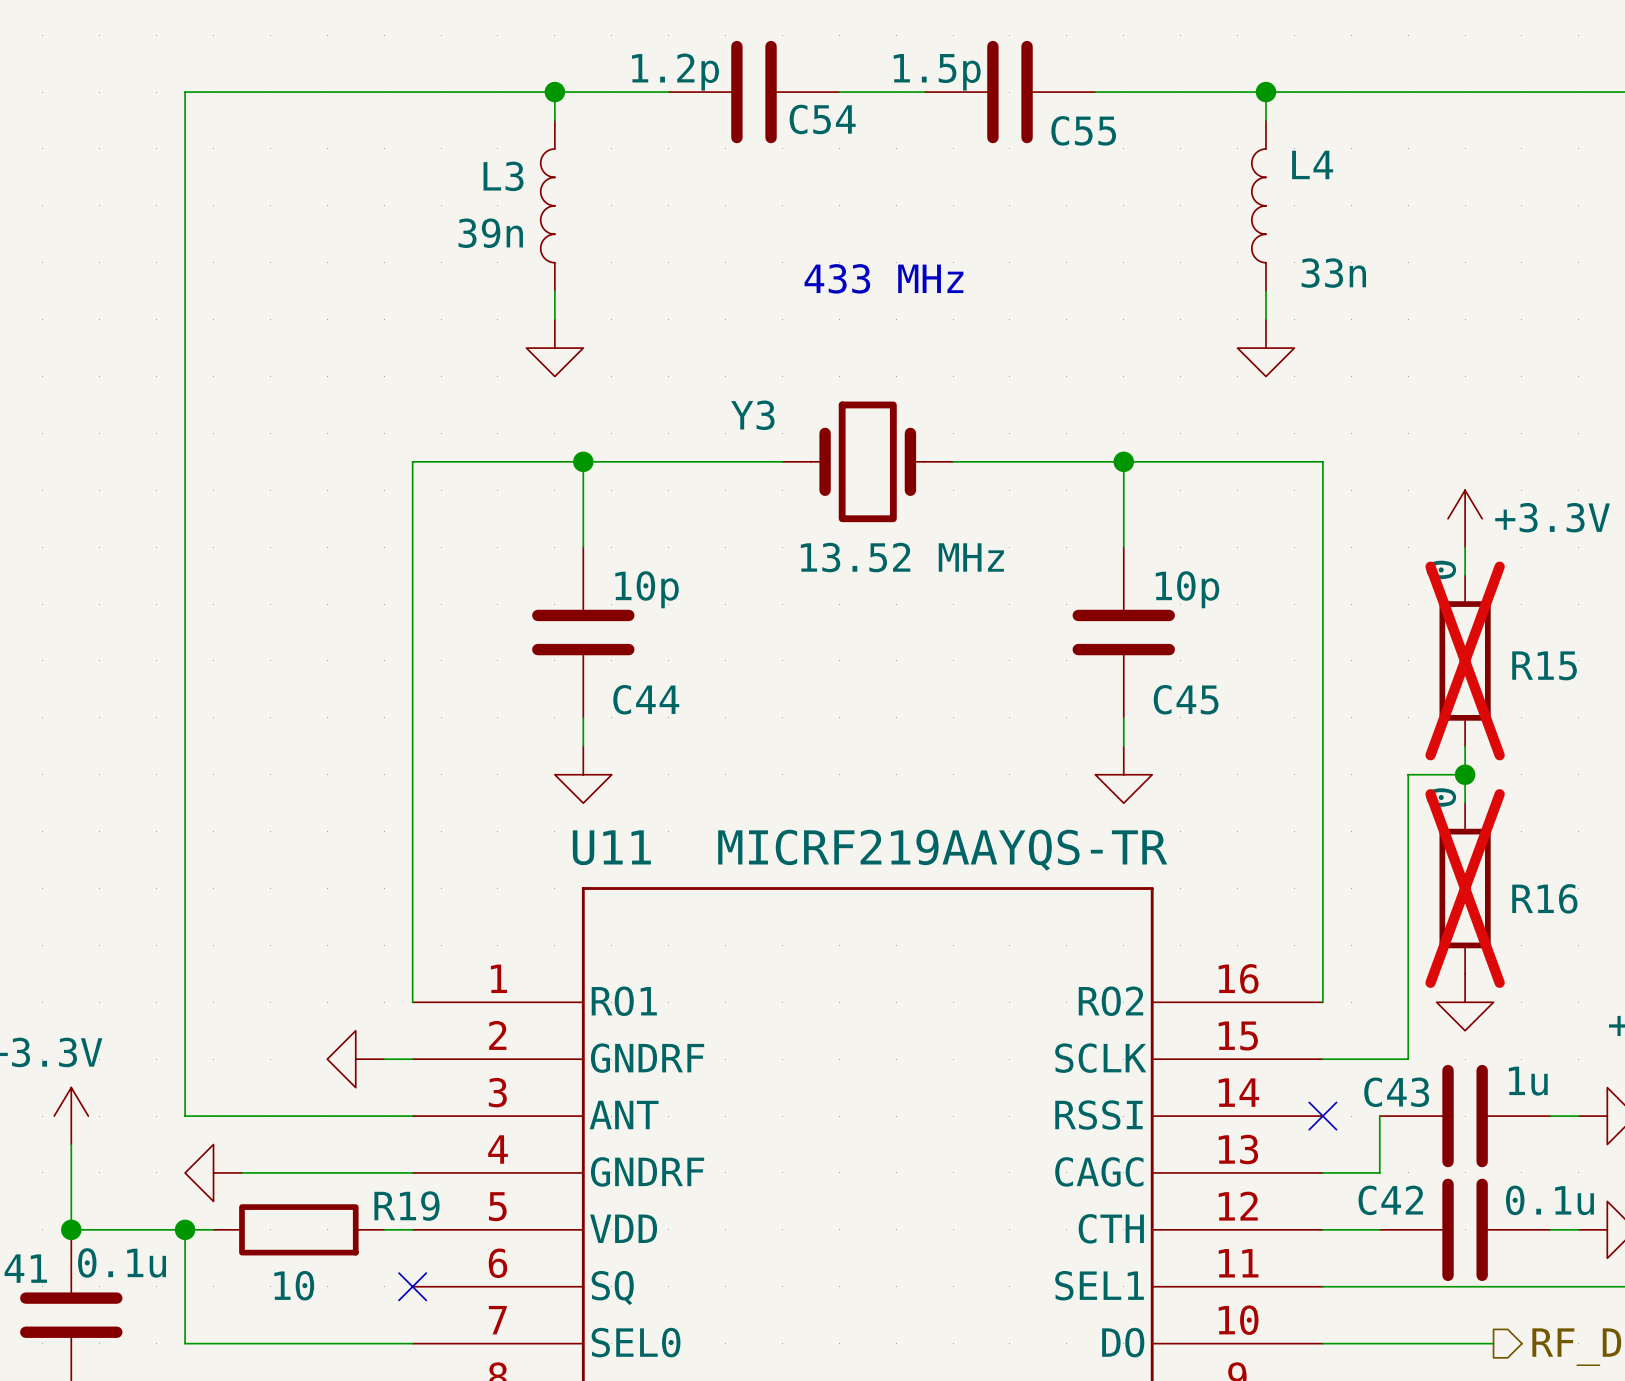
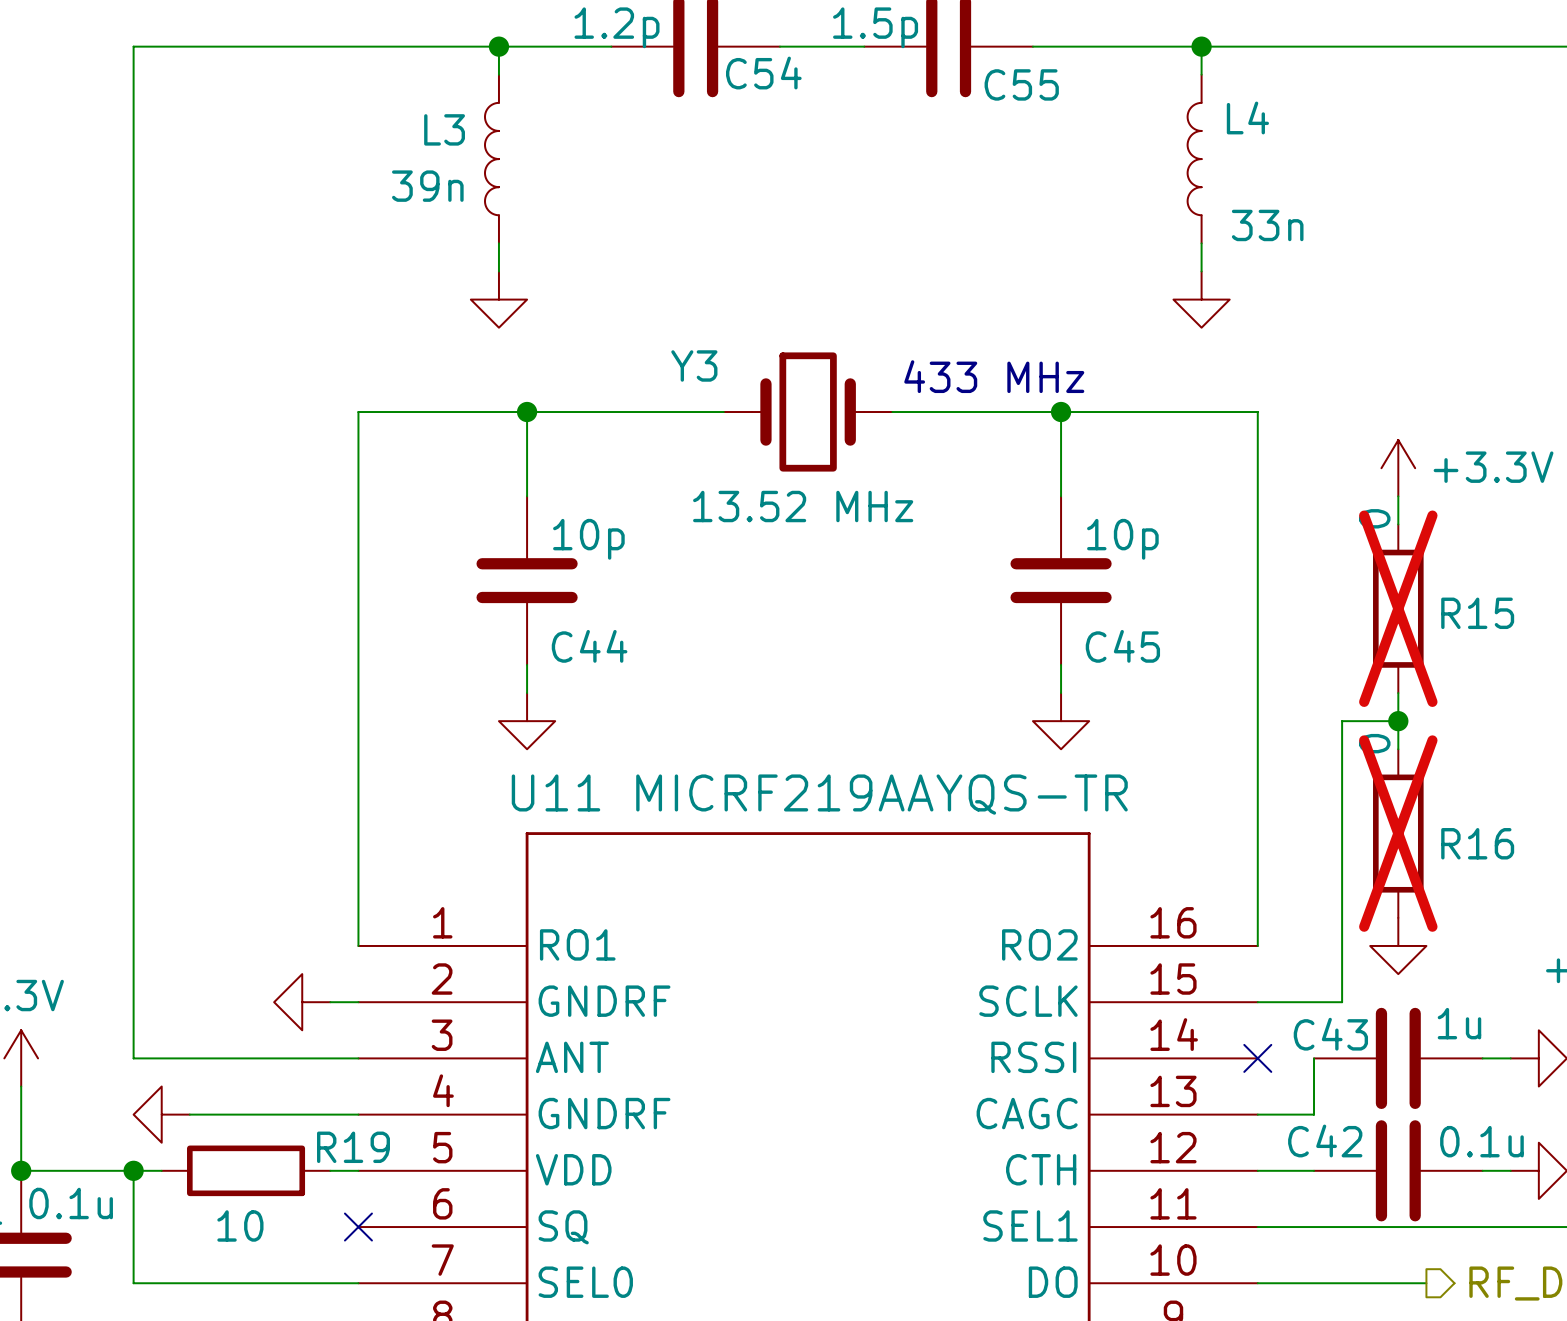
text position: 433 MHz (883, 278) -> 433 MHz (994, 376)
Y3 value position: 13.52 MHz (902, 557) -> 13.52 MHz (803, 506)

